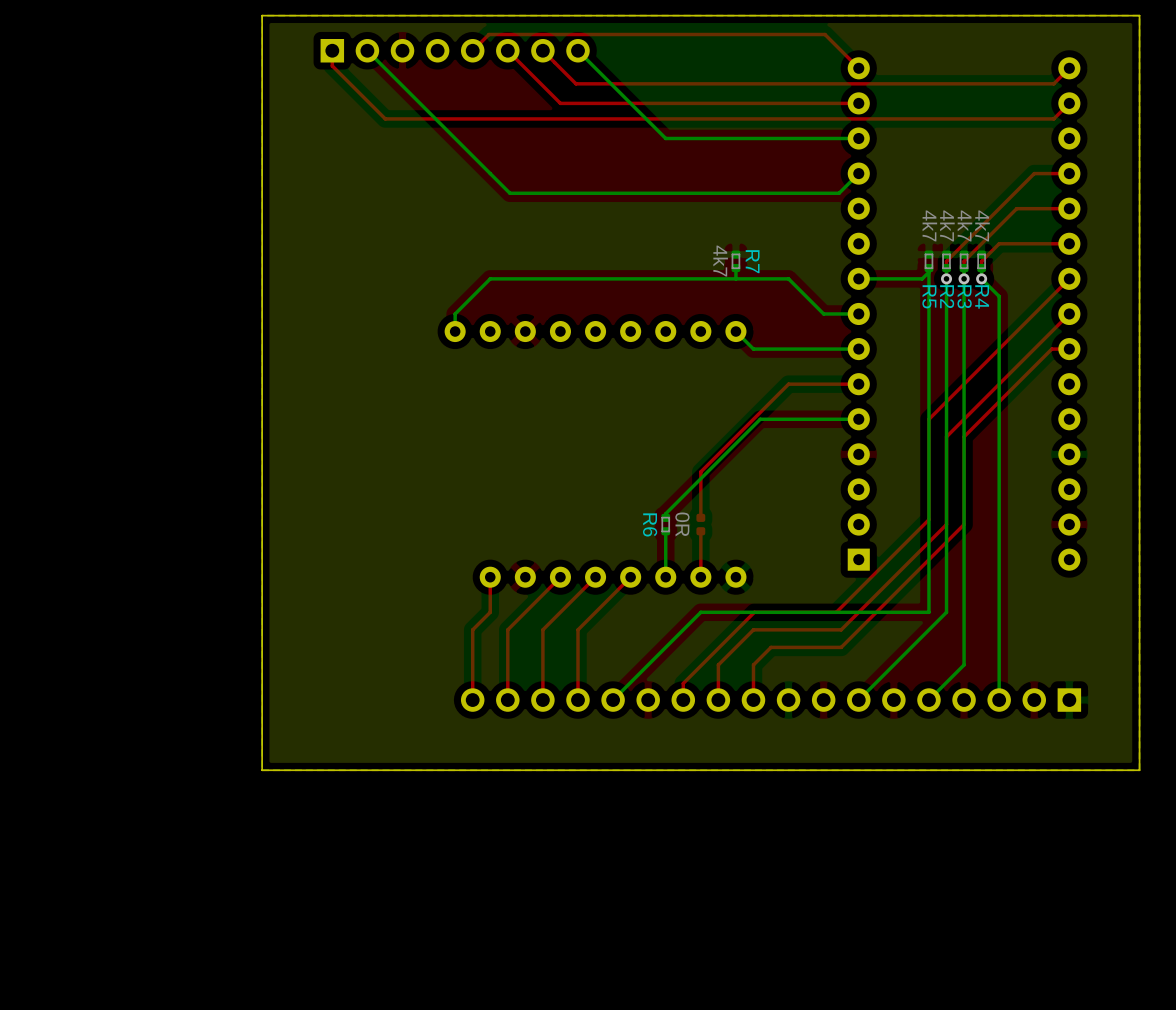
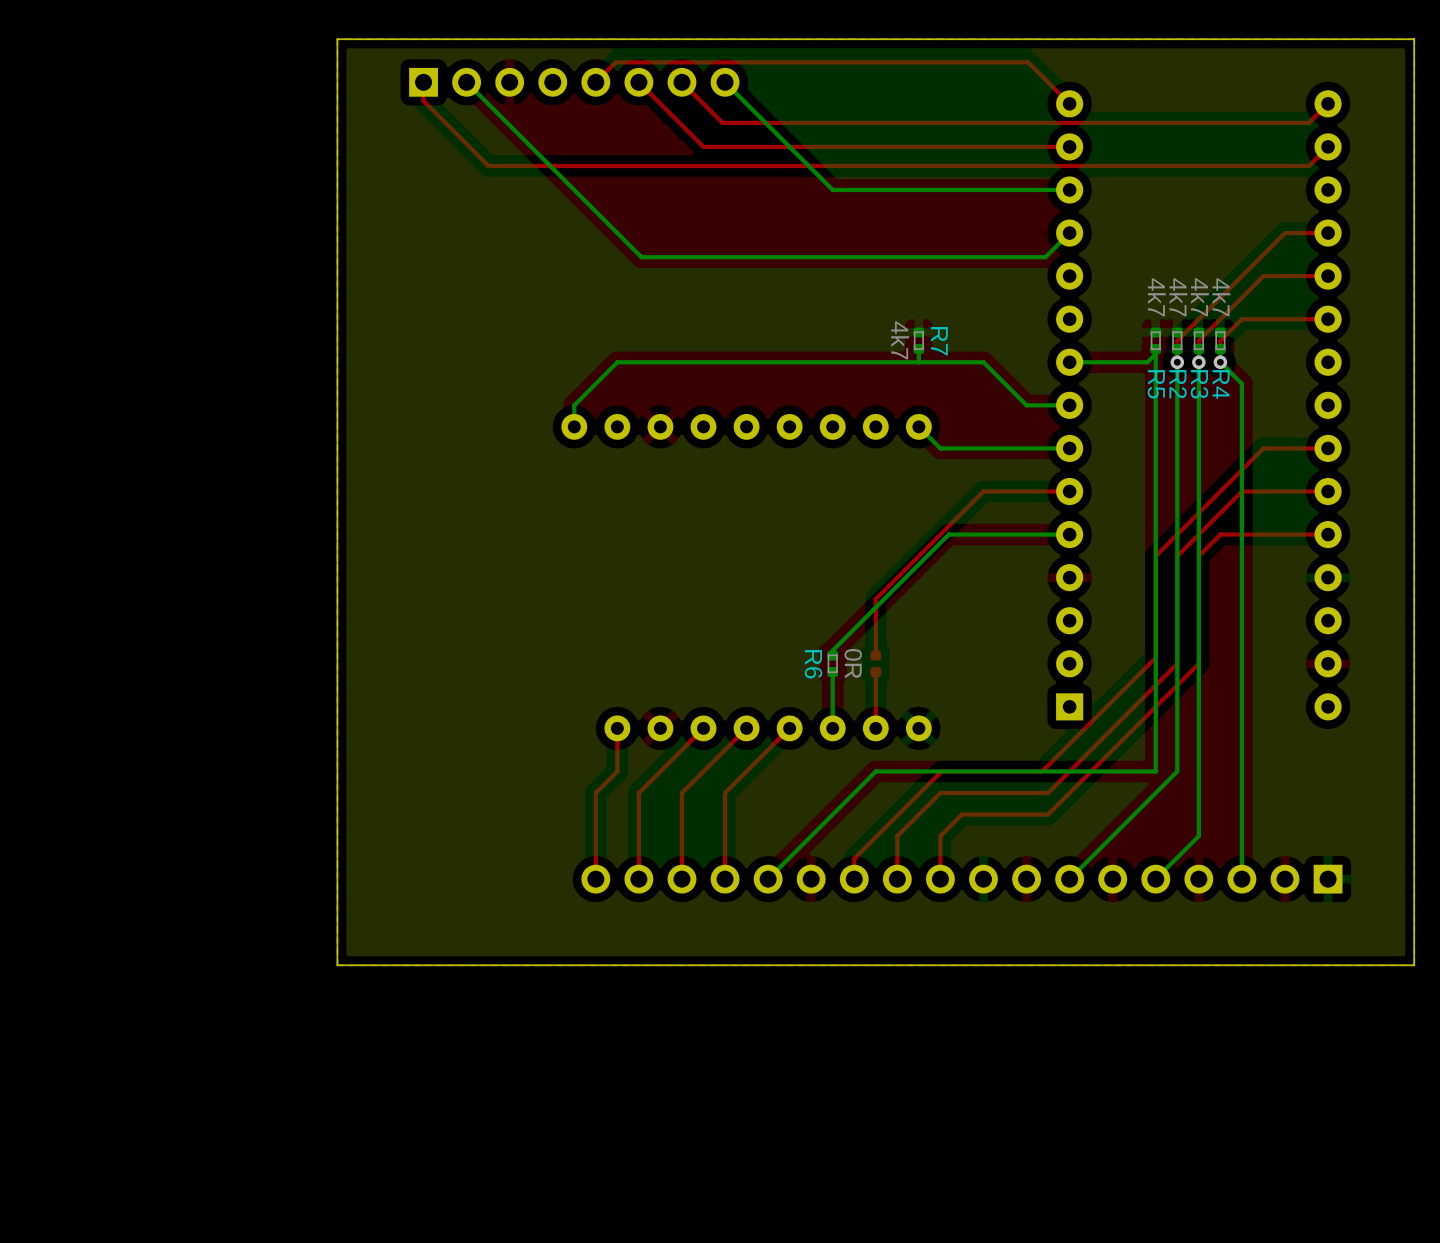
top track: (1069, 278) (928, 419) (928, 436) -> none
top track: (1069, 313) (999, 384) -> (1328, 491) (1241, 491)
top track: (1051, 349) (981, 419) -> (1306, 448) (1263, 448) (1155, 556)
top track: none -> (1328, 534) (1220, 534)

